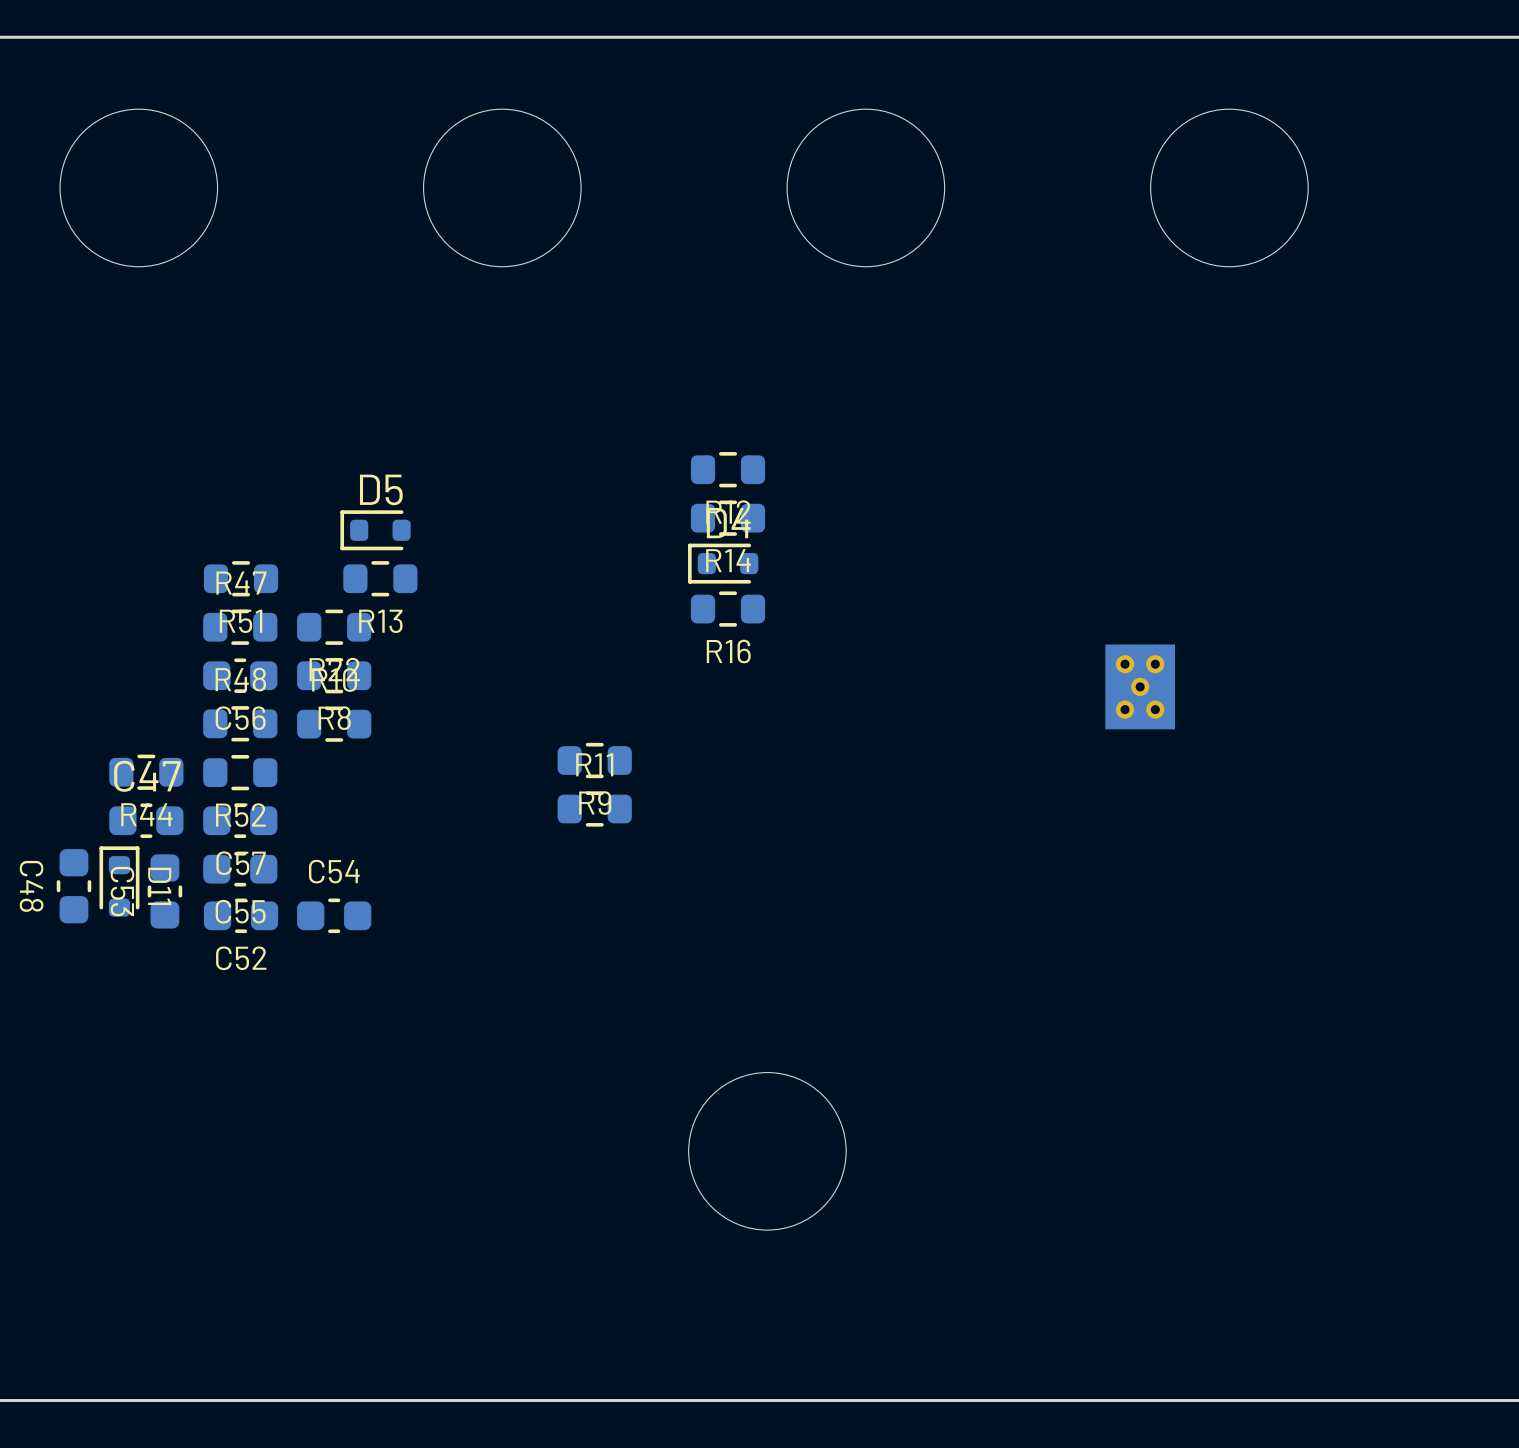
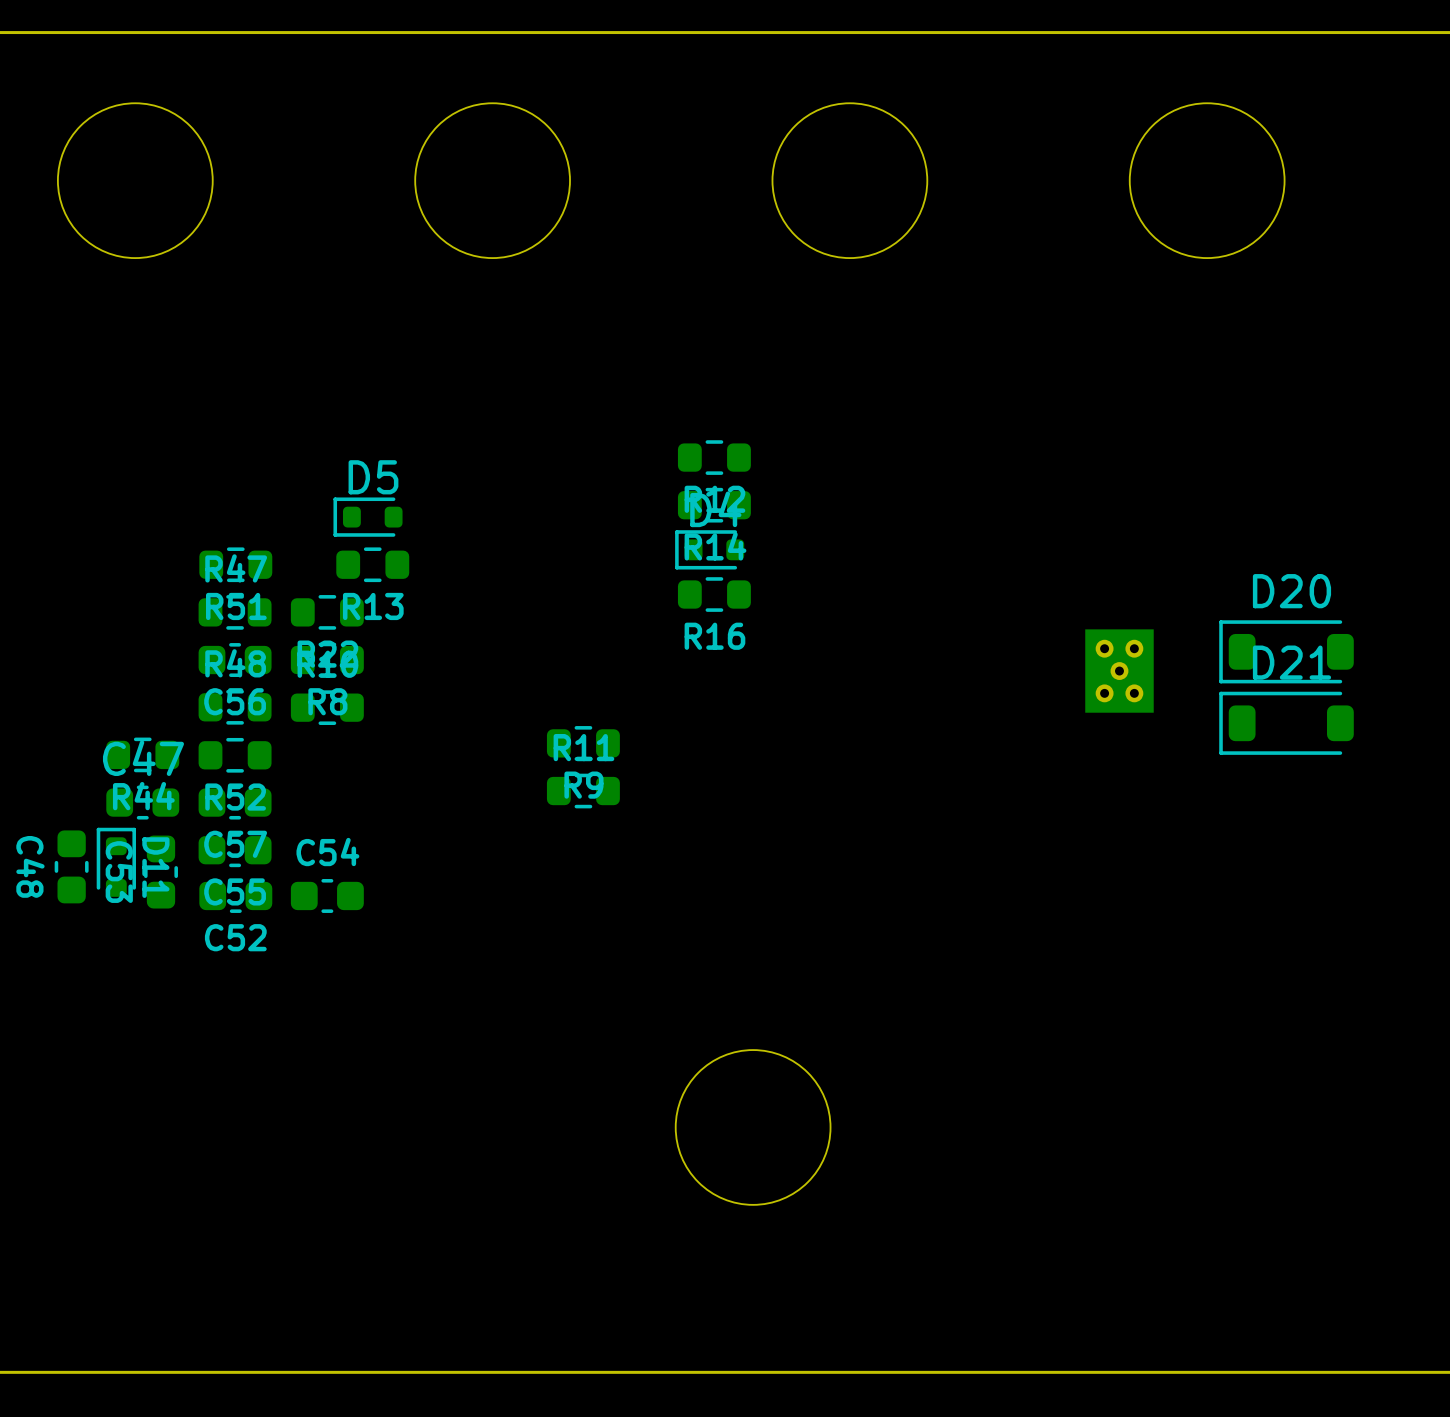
D20: none -> (1286, 651)
D21: none -> (1286, 723)

